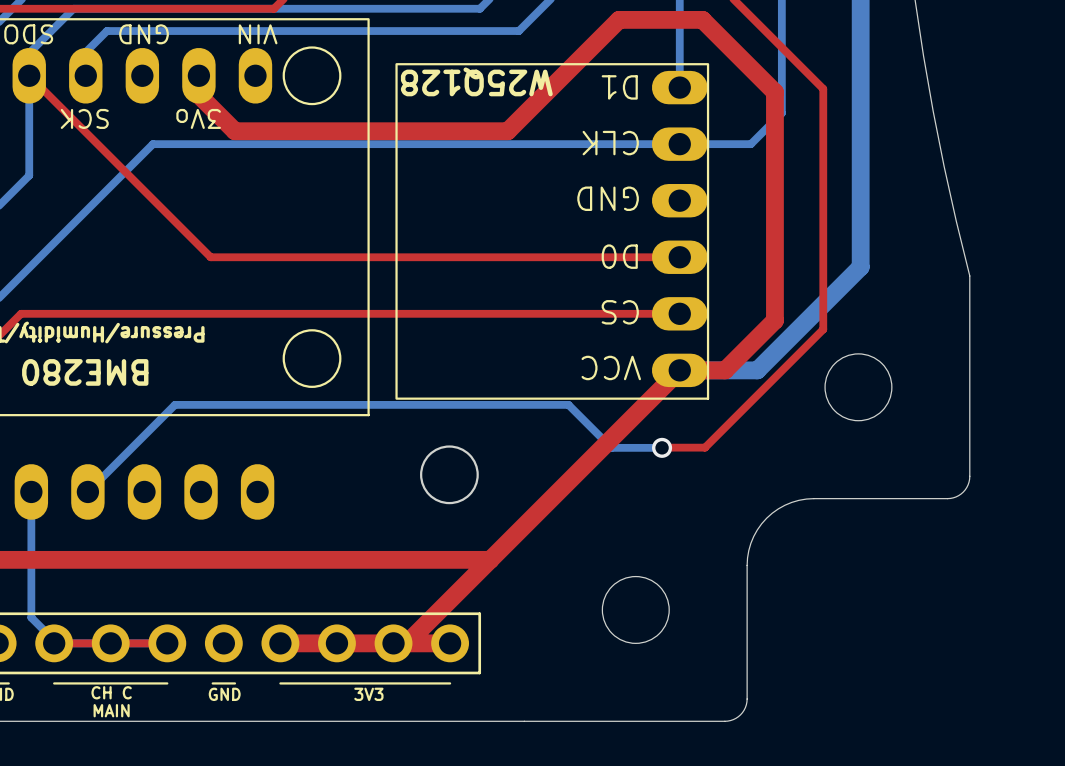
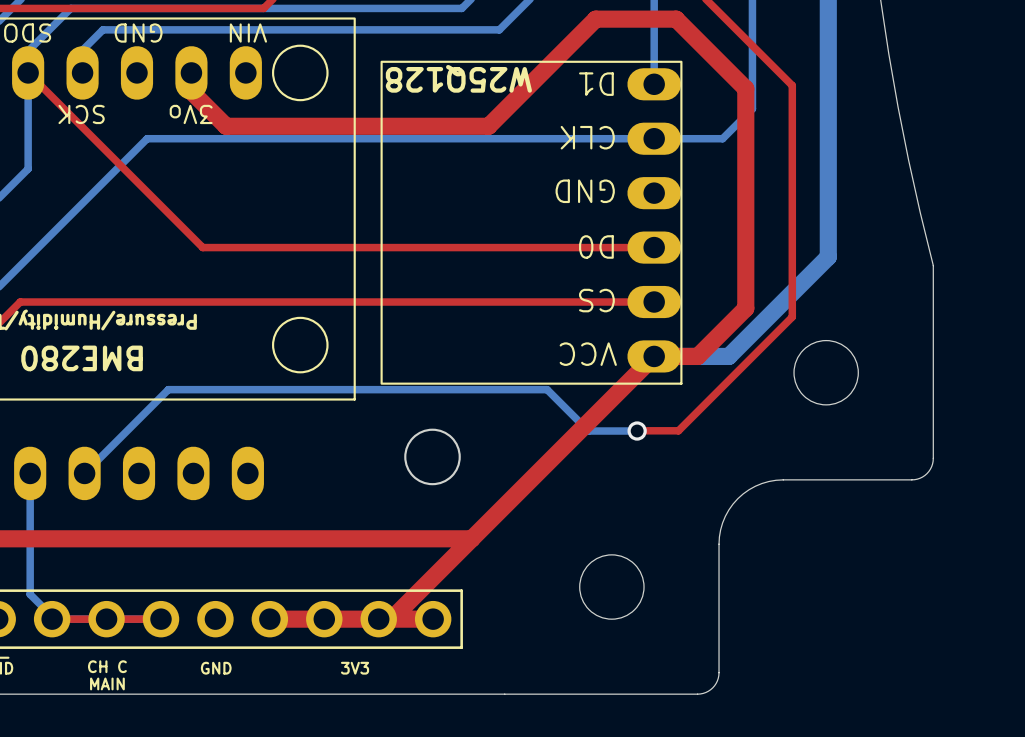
line: (54, 683) (167, 683) -> none
line: (212, 683) (234, 683) -> none
line: (280, 683) (450, 683) -> none

